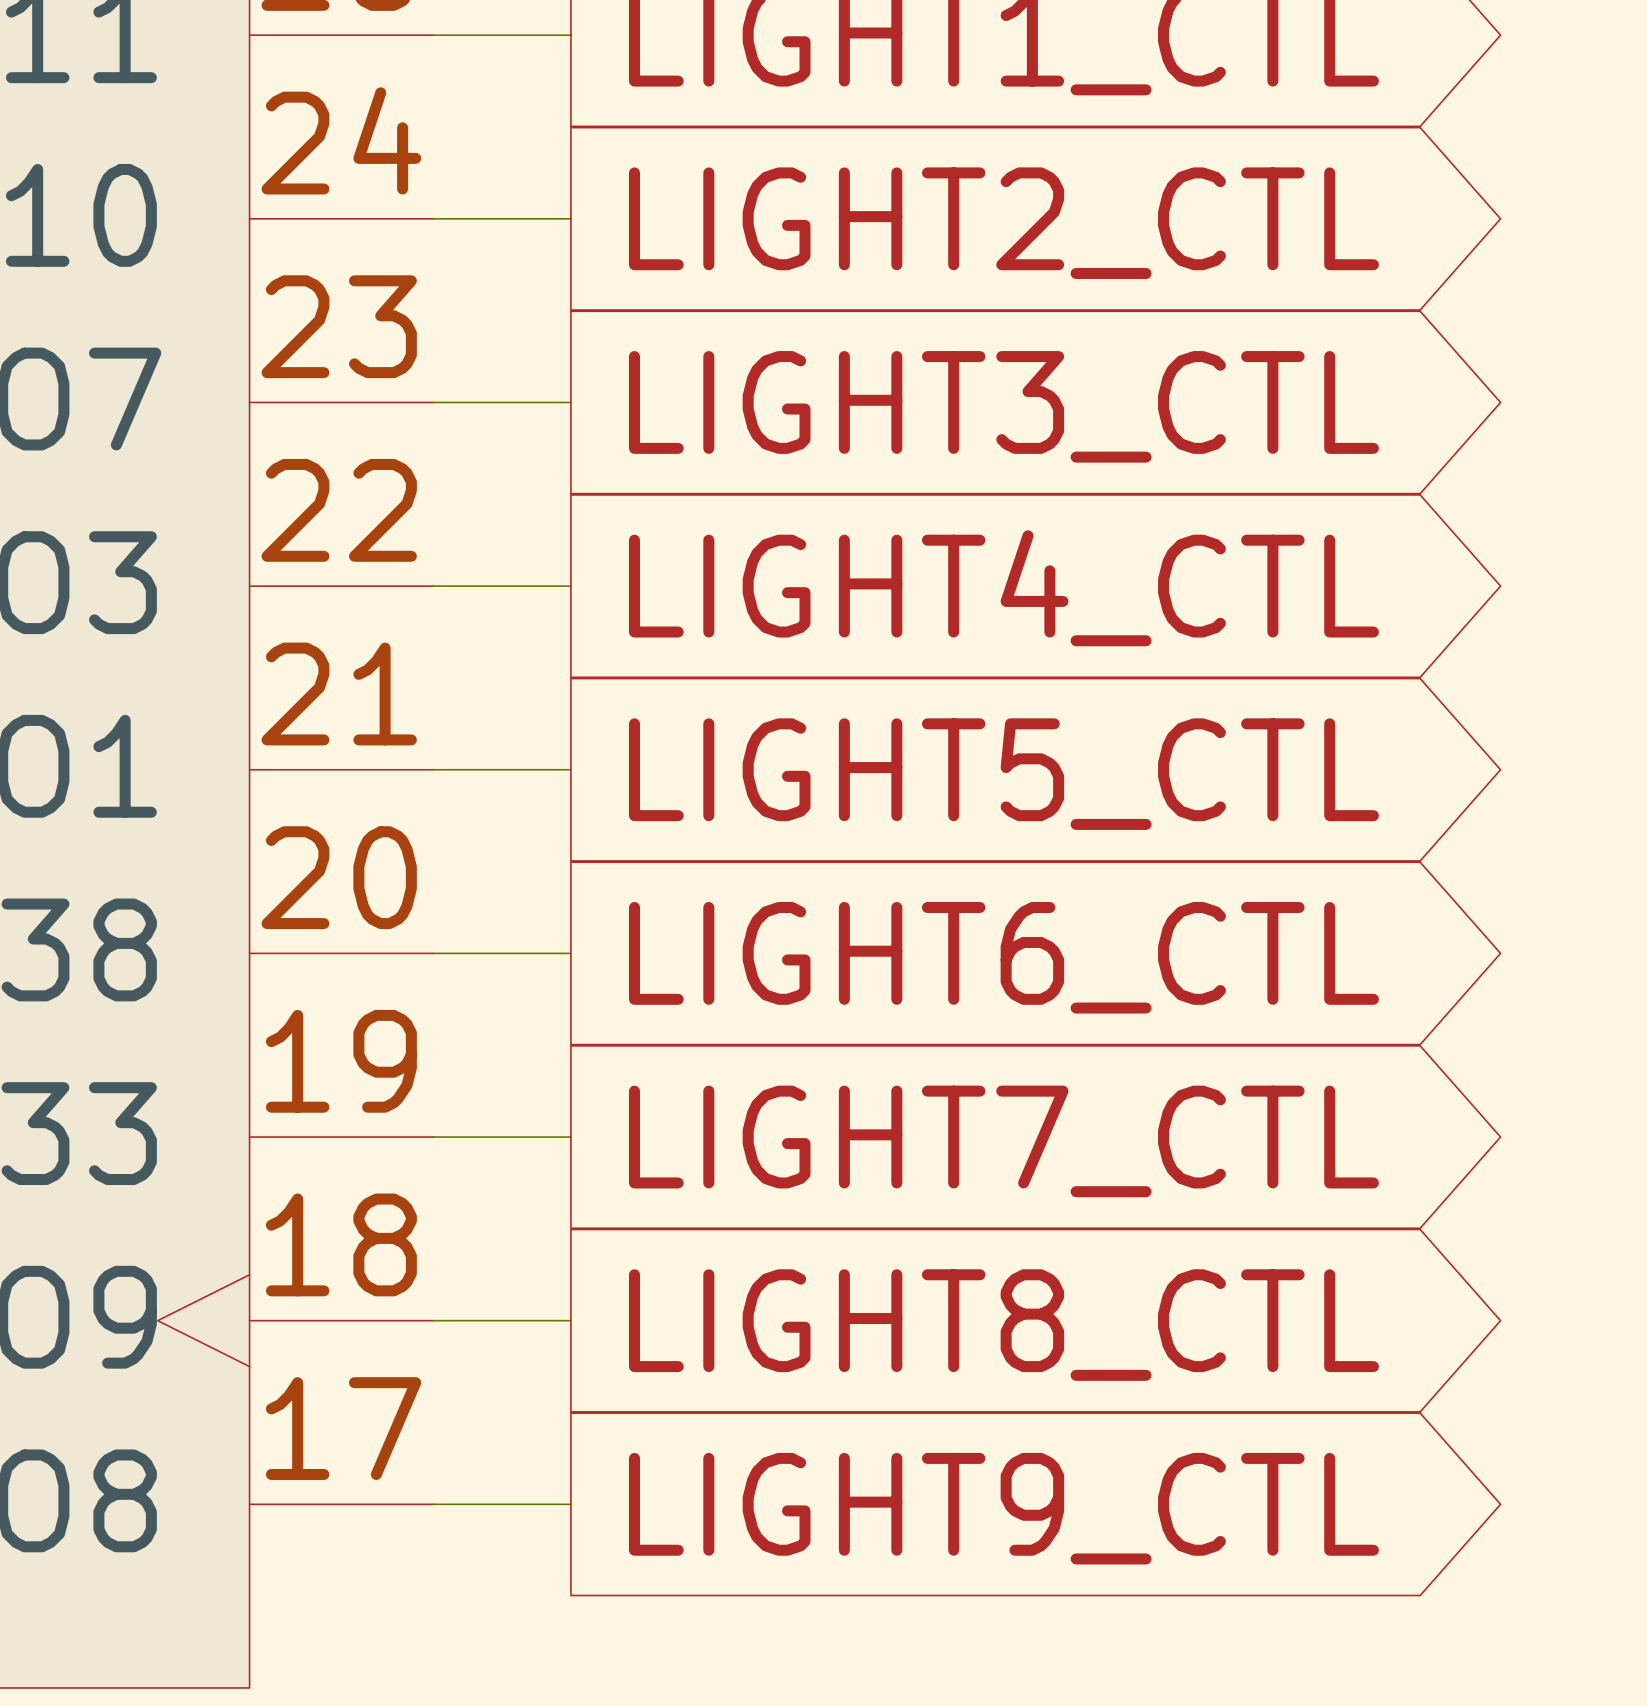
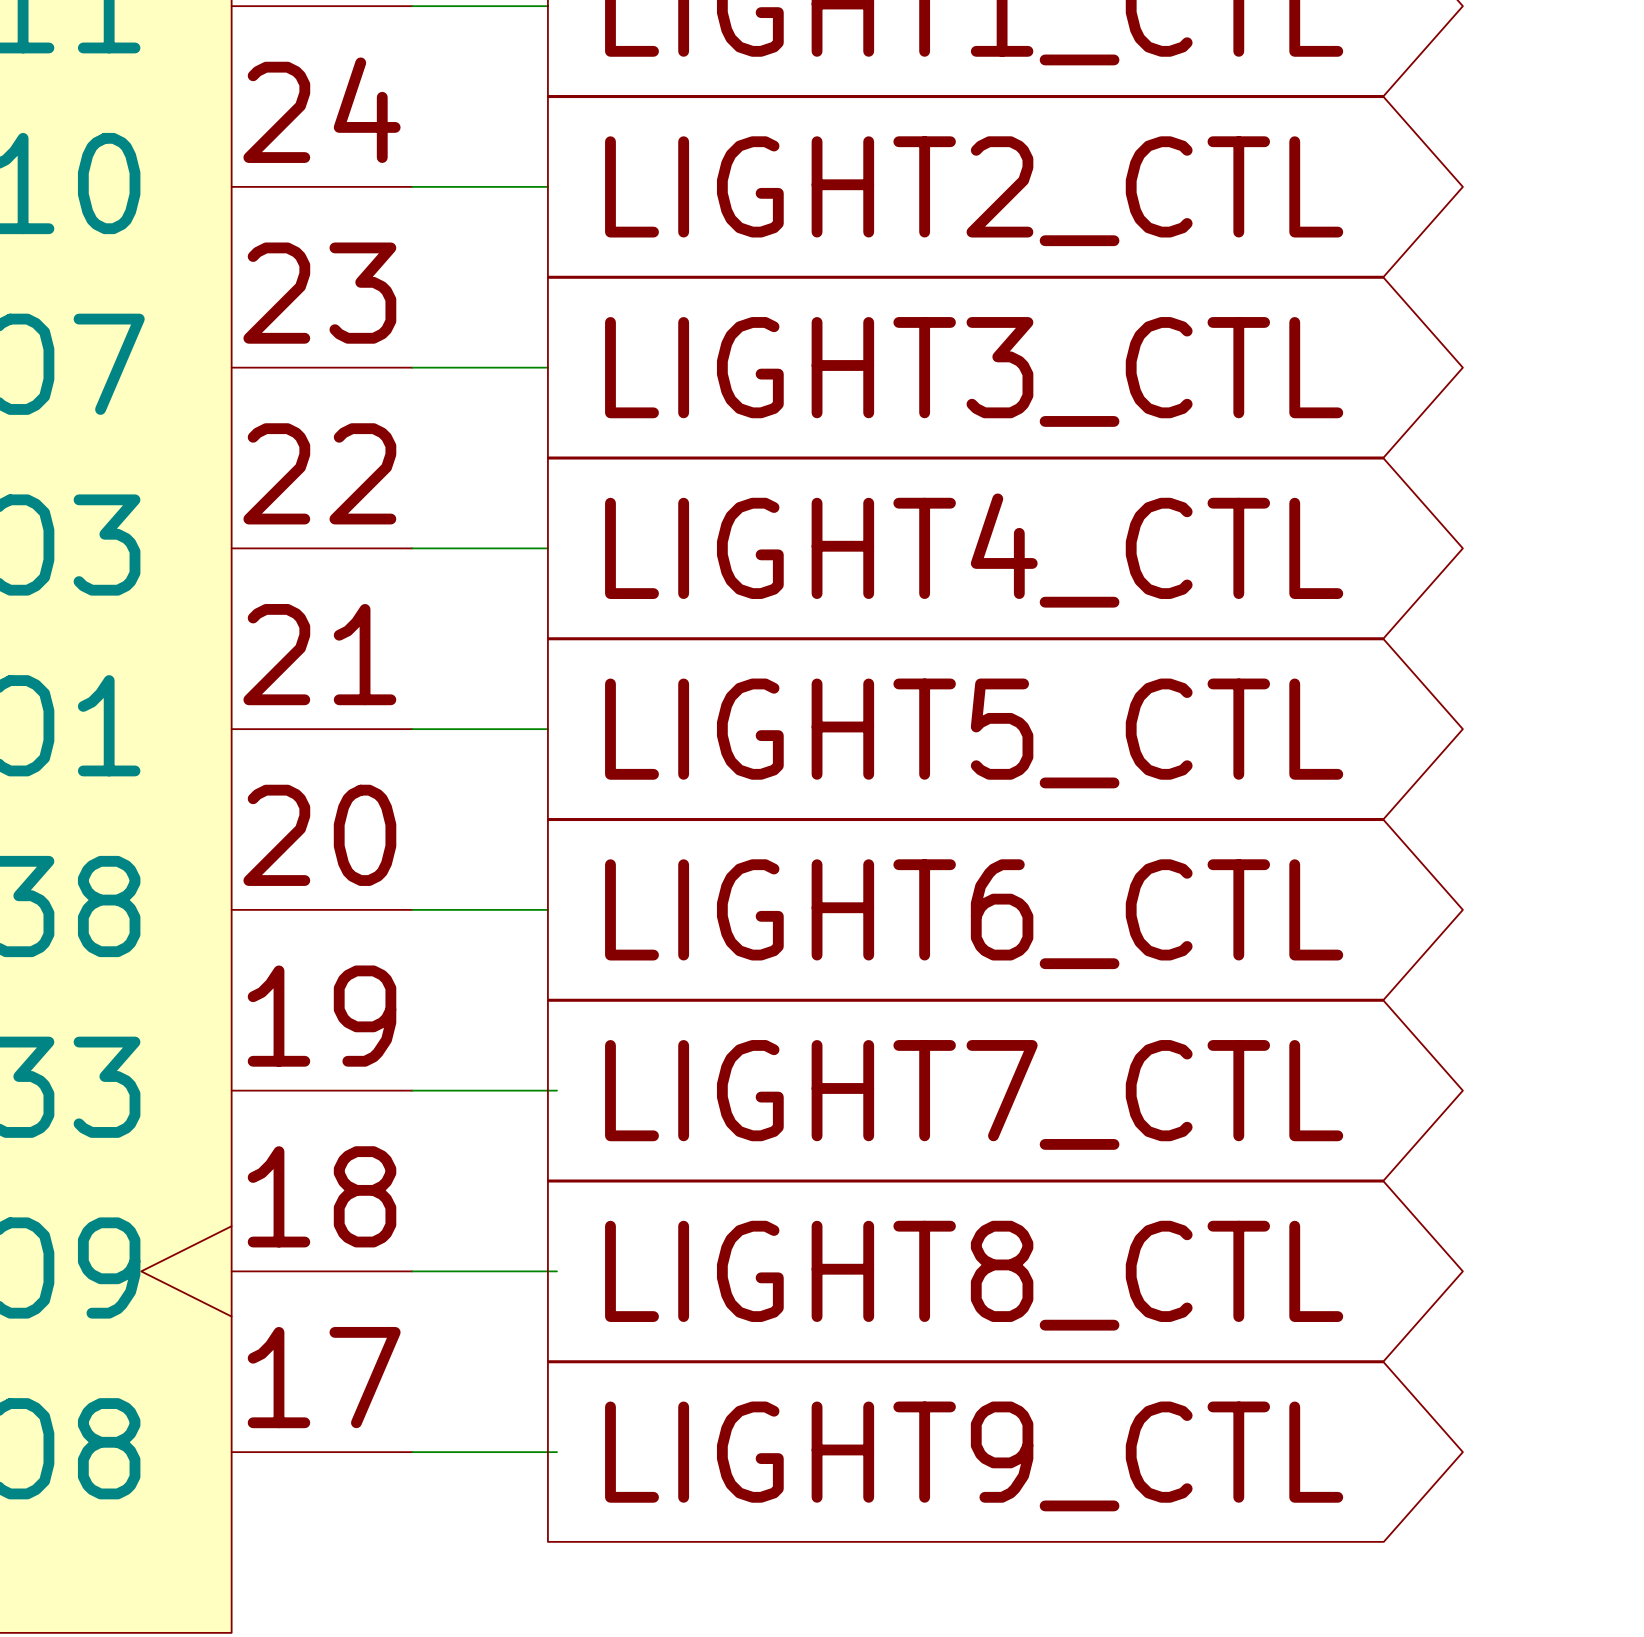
wire: none -> (547, 1090) (556, 1090)
wire: none -> (547, 1271) (556, 1271)
wire: none -> (547, 1452) (556, 1452)

